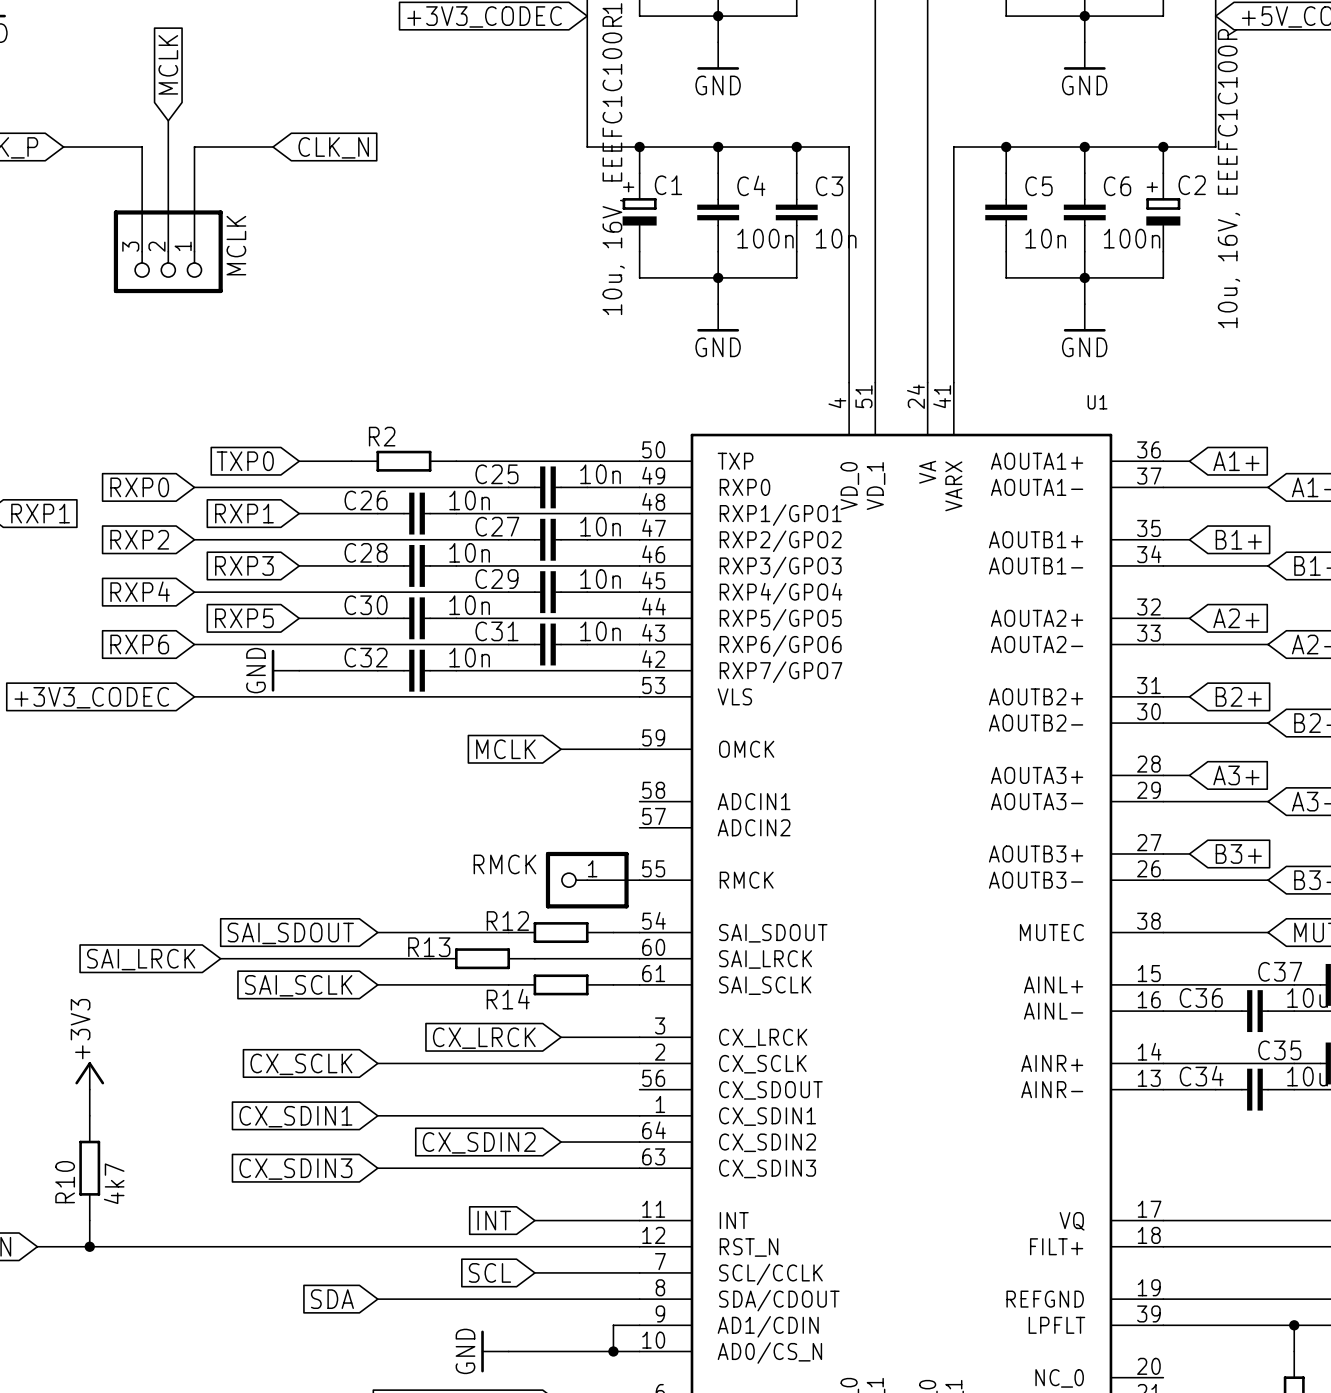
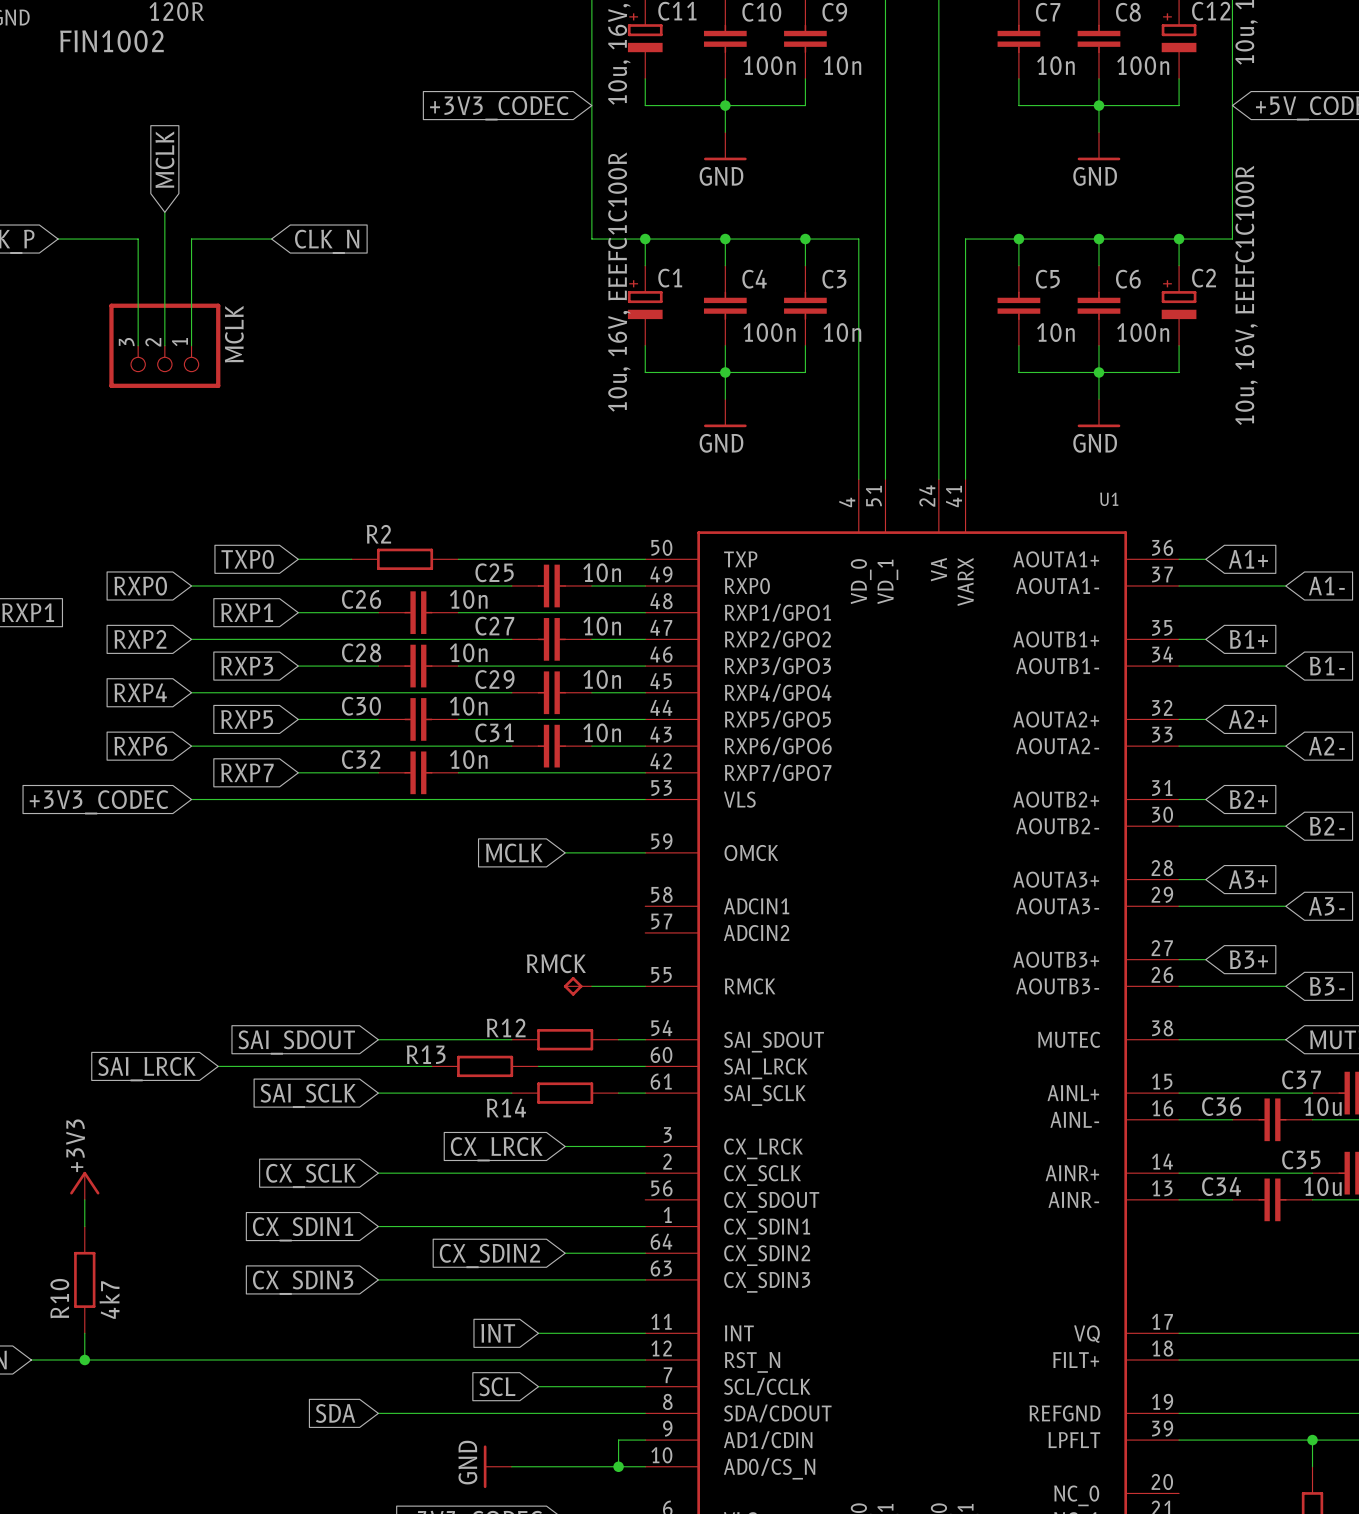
global label: none -> RXP7 (247, 772)
power symbol: GND (285, 670) -> none
RMCK: none -> (577, 986)
RMCK: (587, 880) -> none

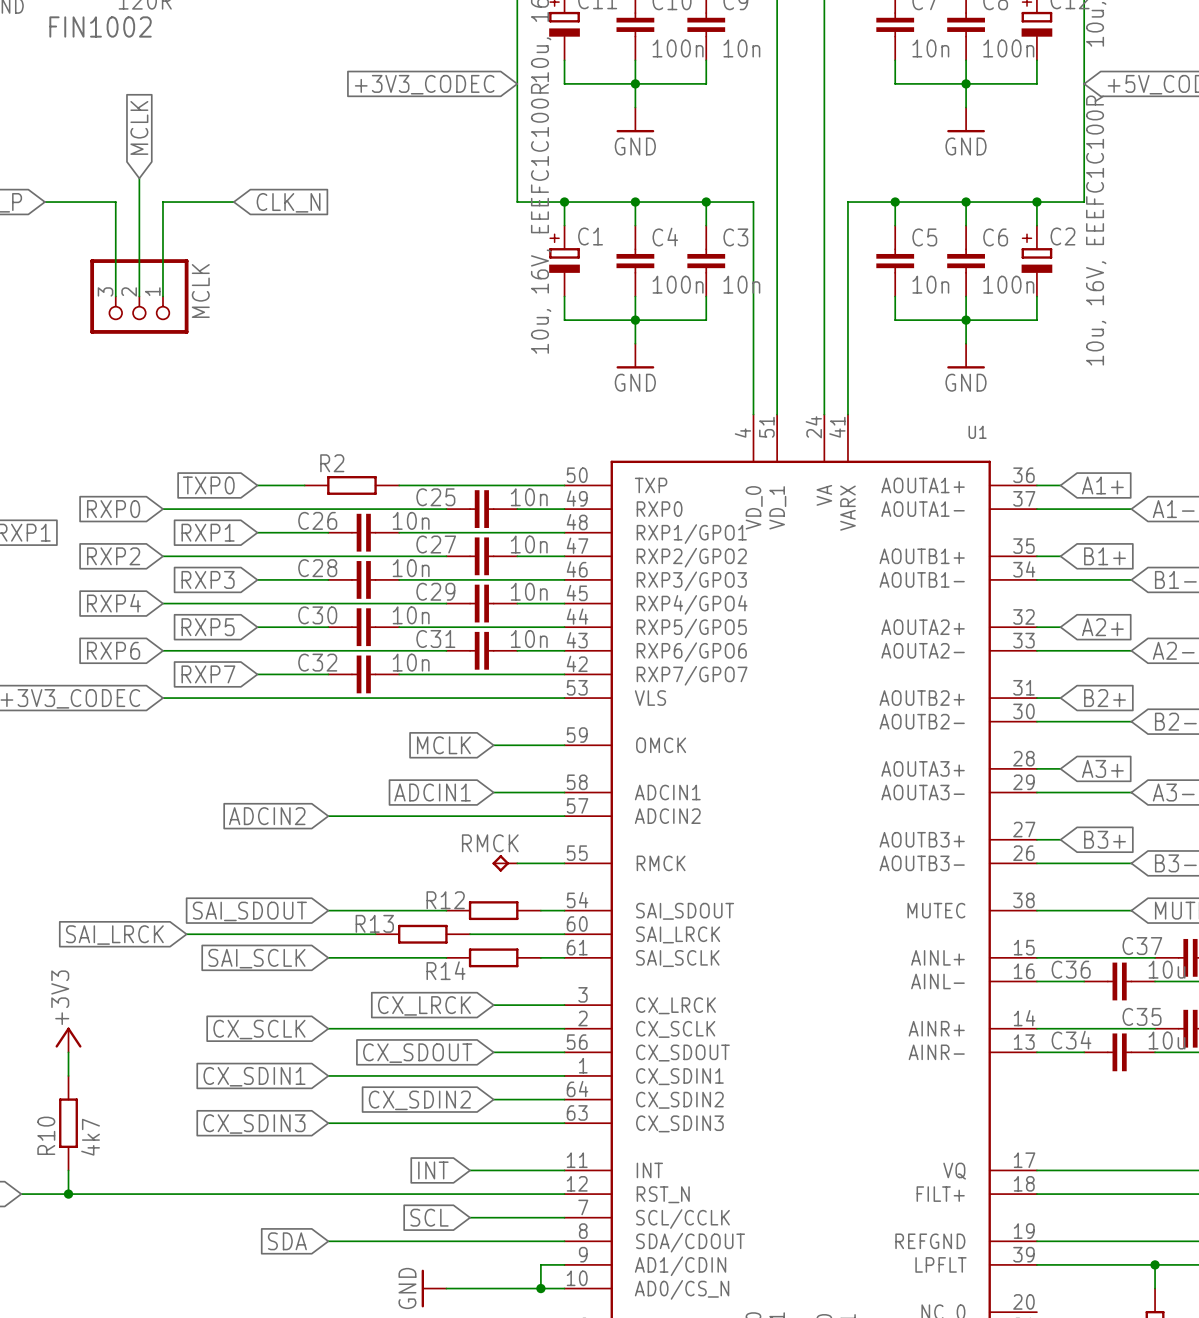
global label: none -> ADCIN1 (432, 792)
wire: none -> (493, 792) (564, 792)
wire: none -> (328, 816) (564, 816)
global label: none -> ADCIN2 (267, 816)
wire: none -> (493, 1052) (564, 1052)
global label: none -> CX_SDOUT (417, 1053)

